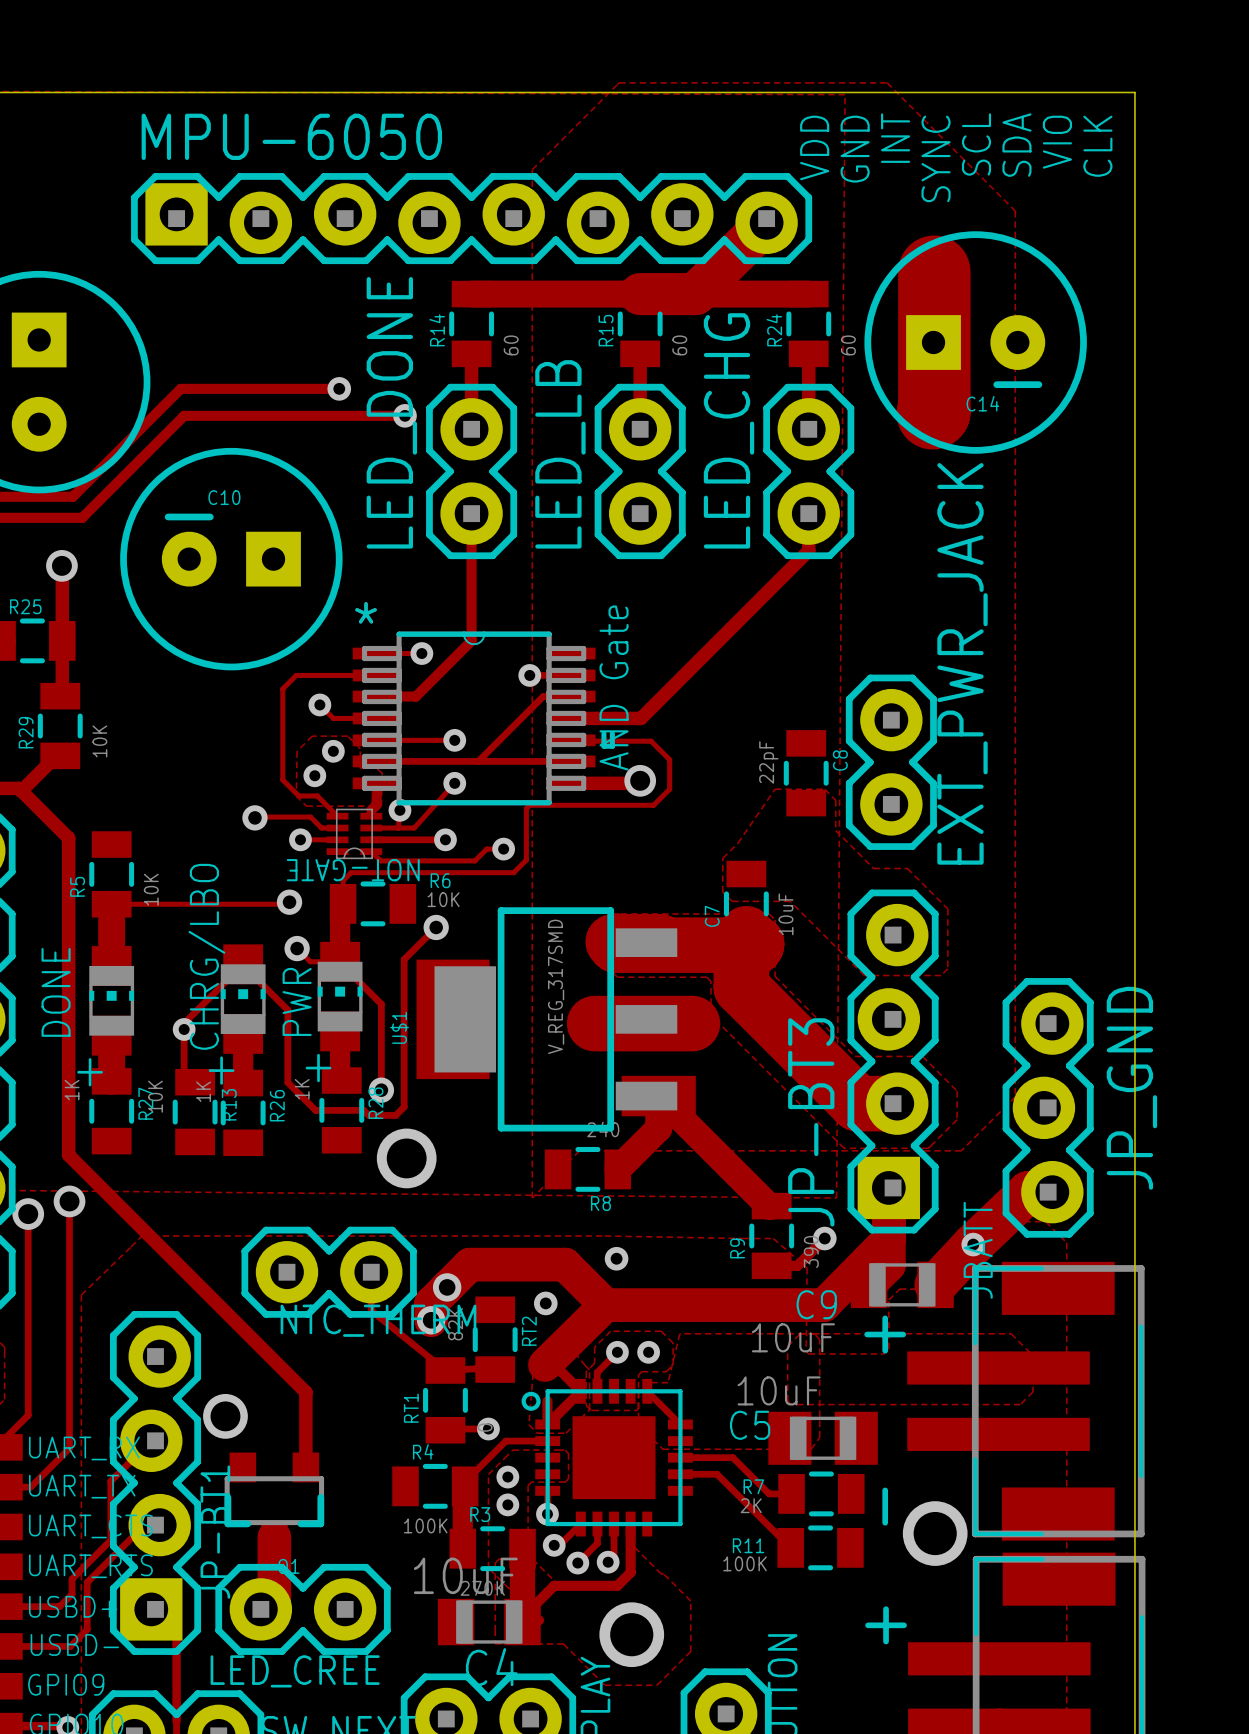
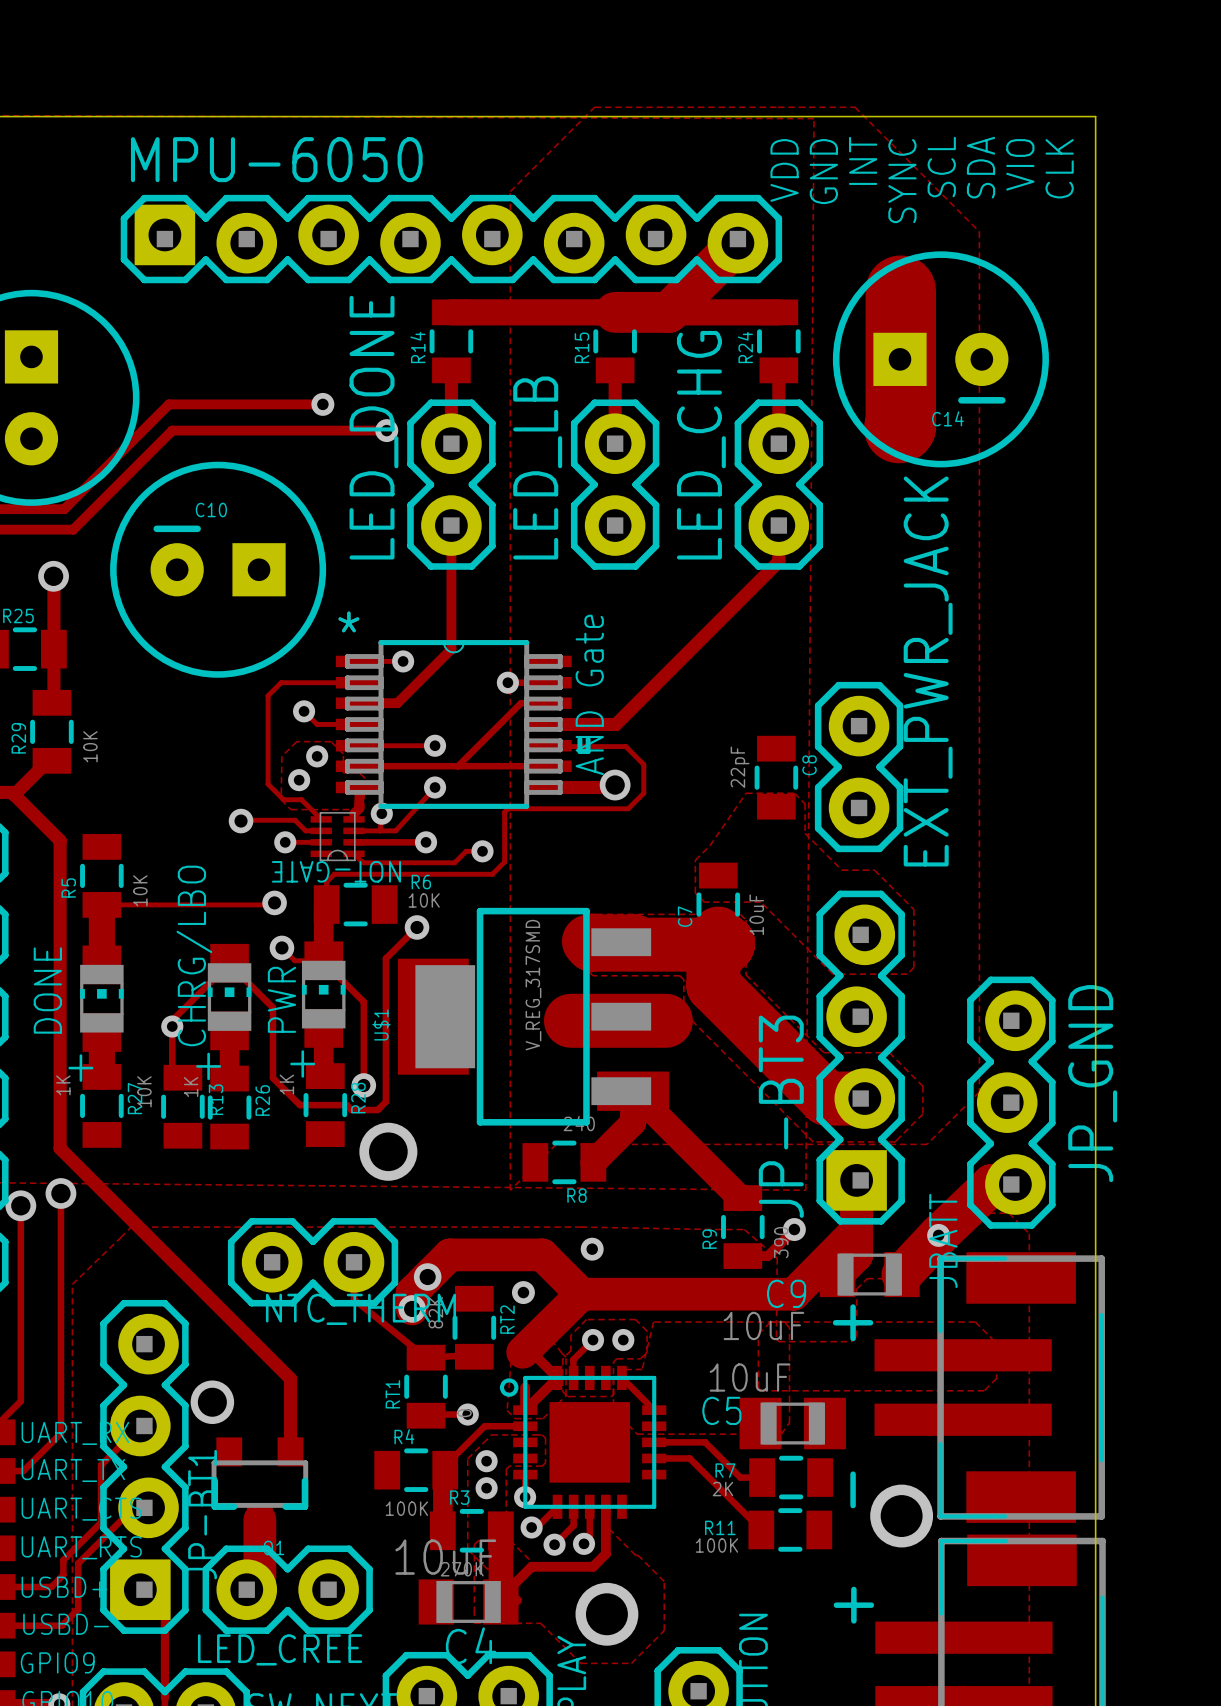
R14 value: 60 (511, 345) -> none
R15 value: 60 (679, 345) -> none
R24 value: 60 (848, 345) -> none

